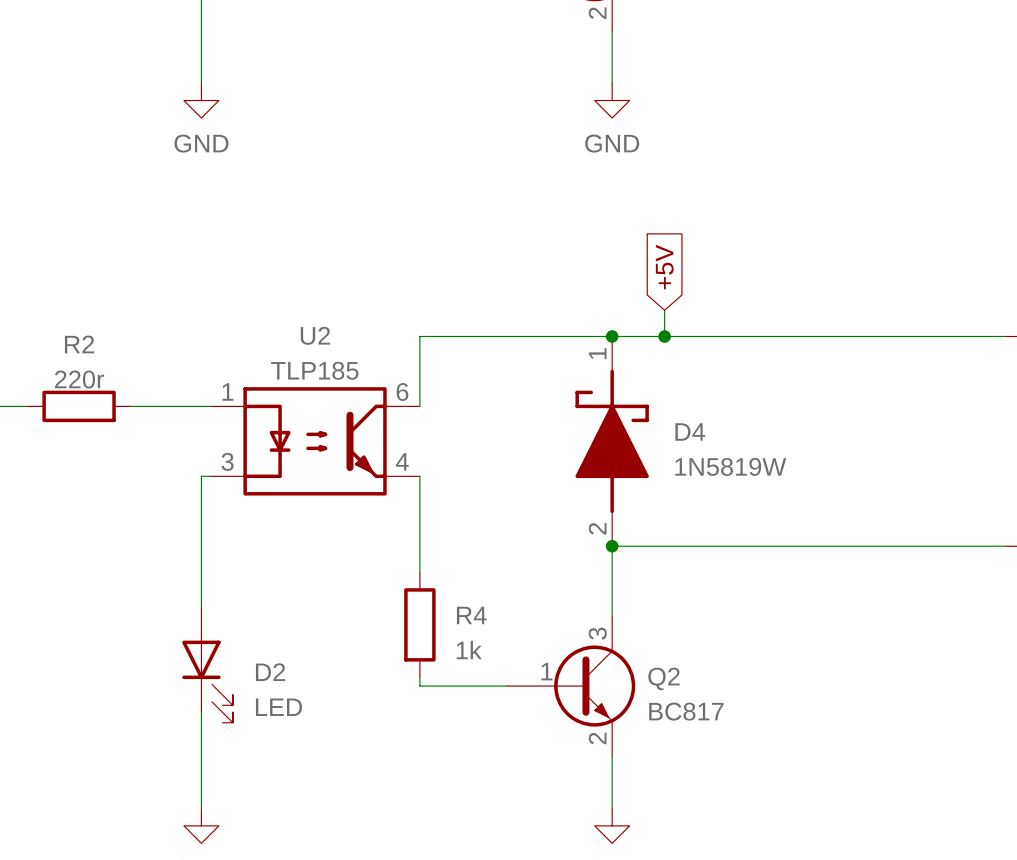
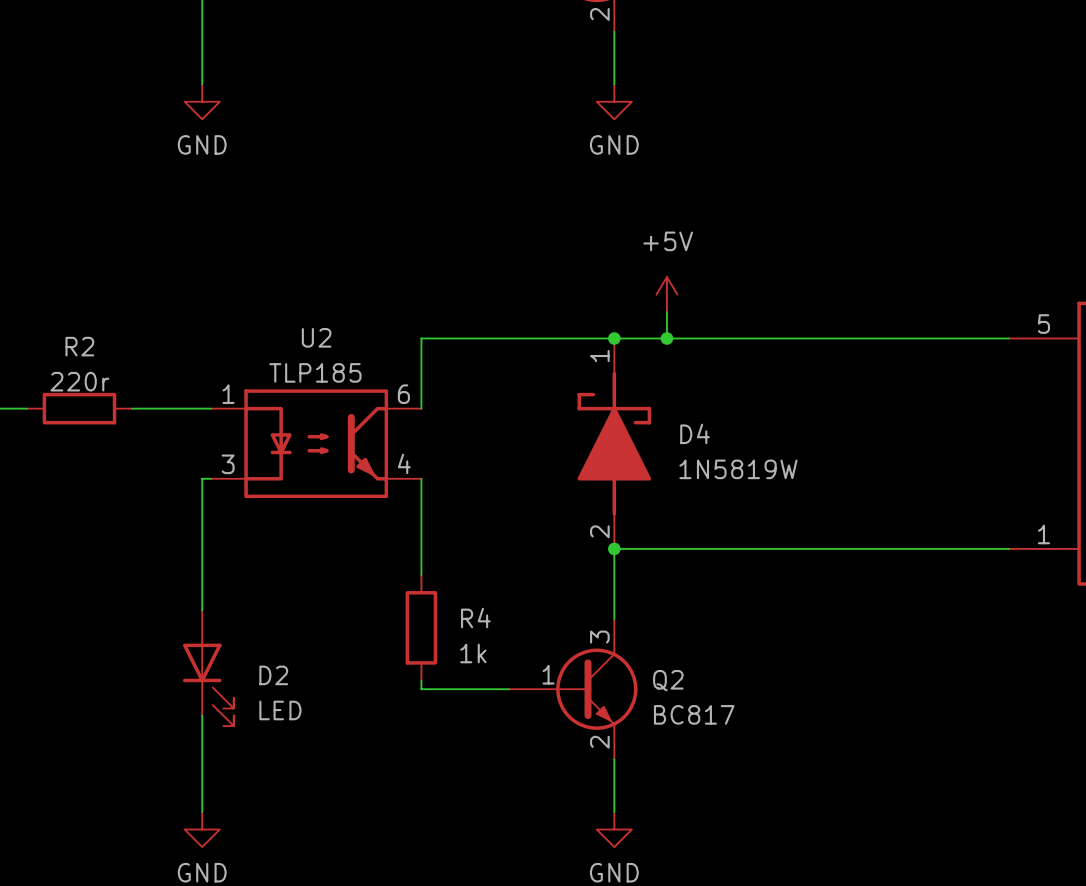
global label: +5V (664, 267) -> none
power symbol: none -> +5V (666, 294)

